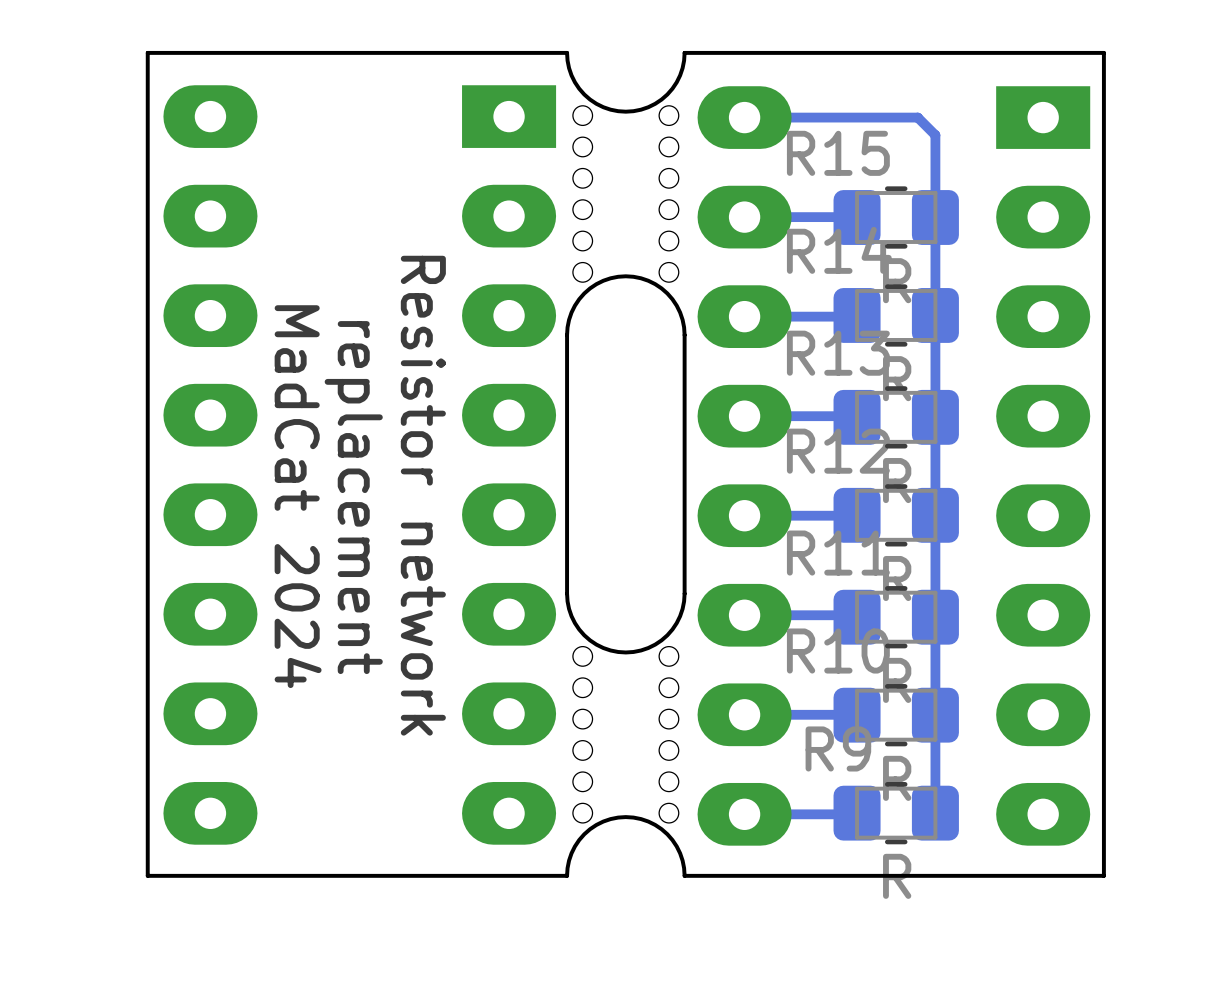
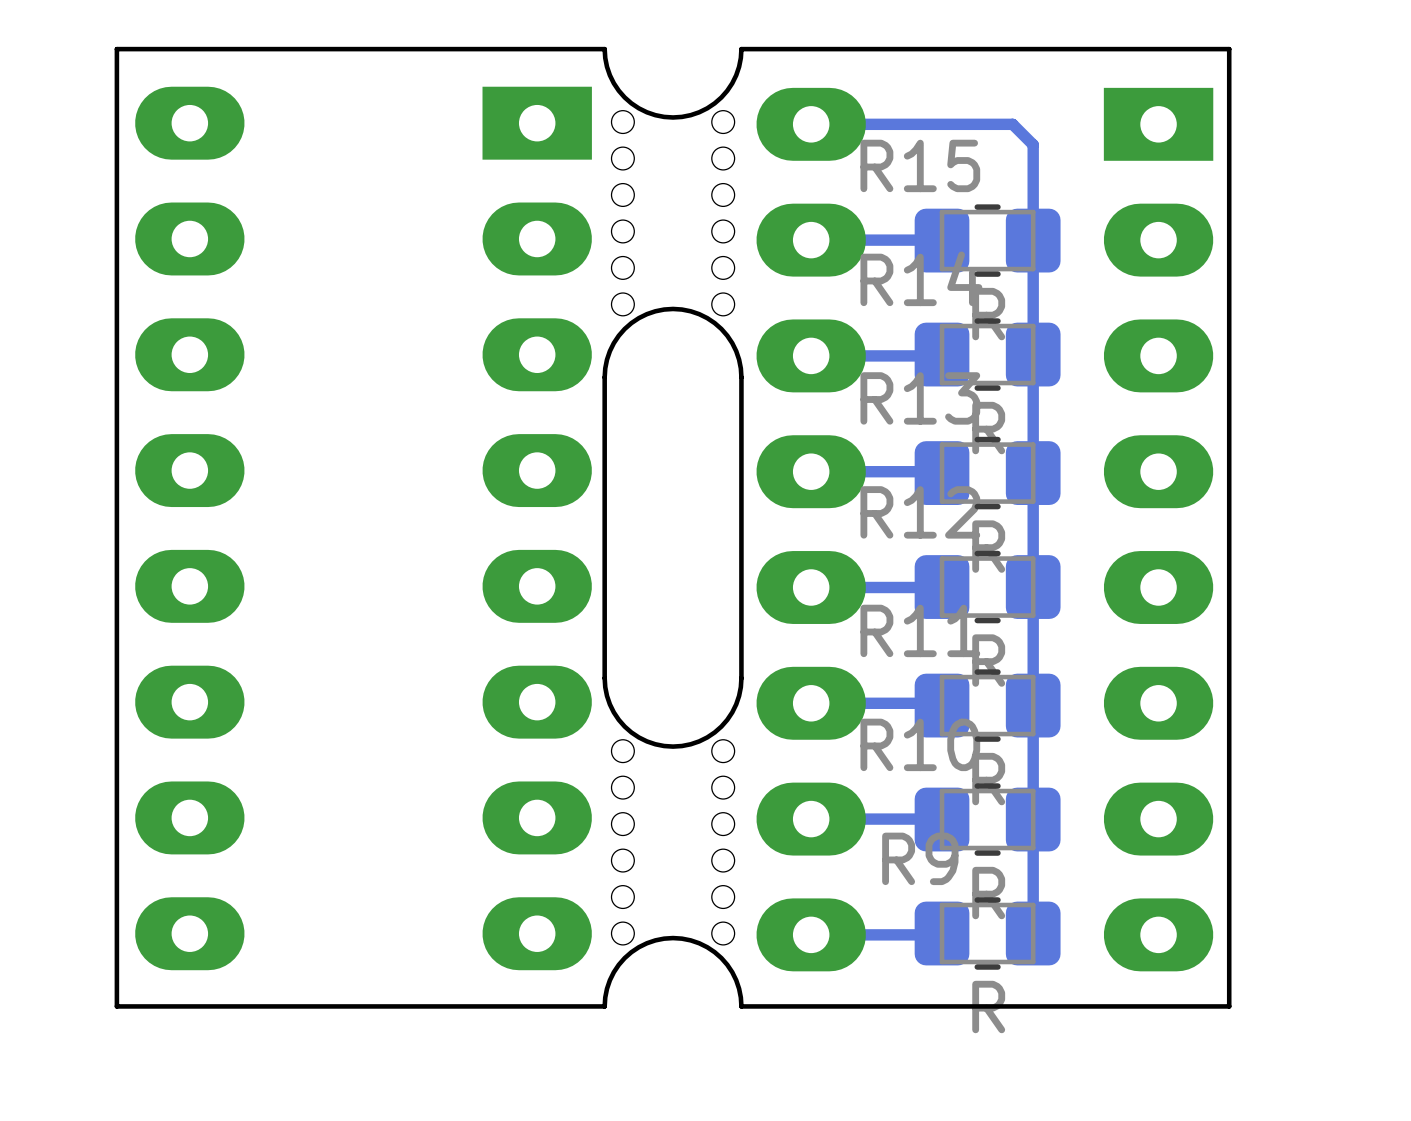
text: Resistor network (423, 495) -> none
text: MadCat 2024 (298, 496) -> none
text: replacement (353, 497) -> none

